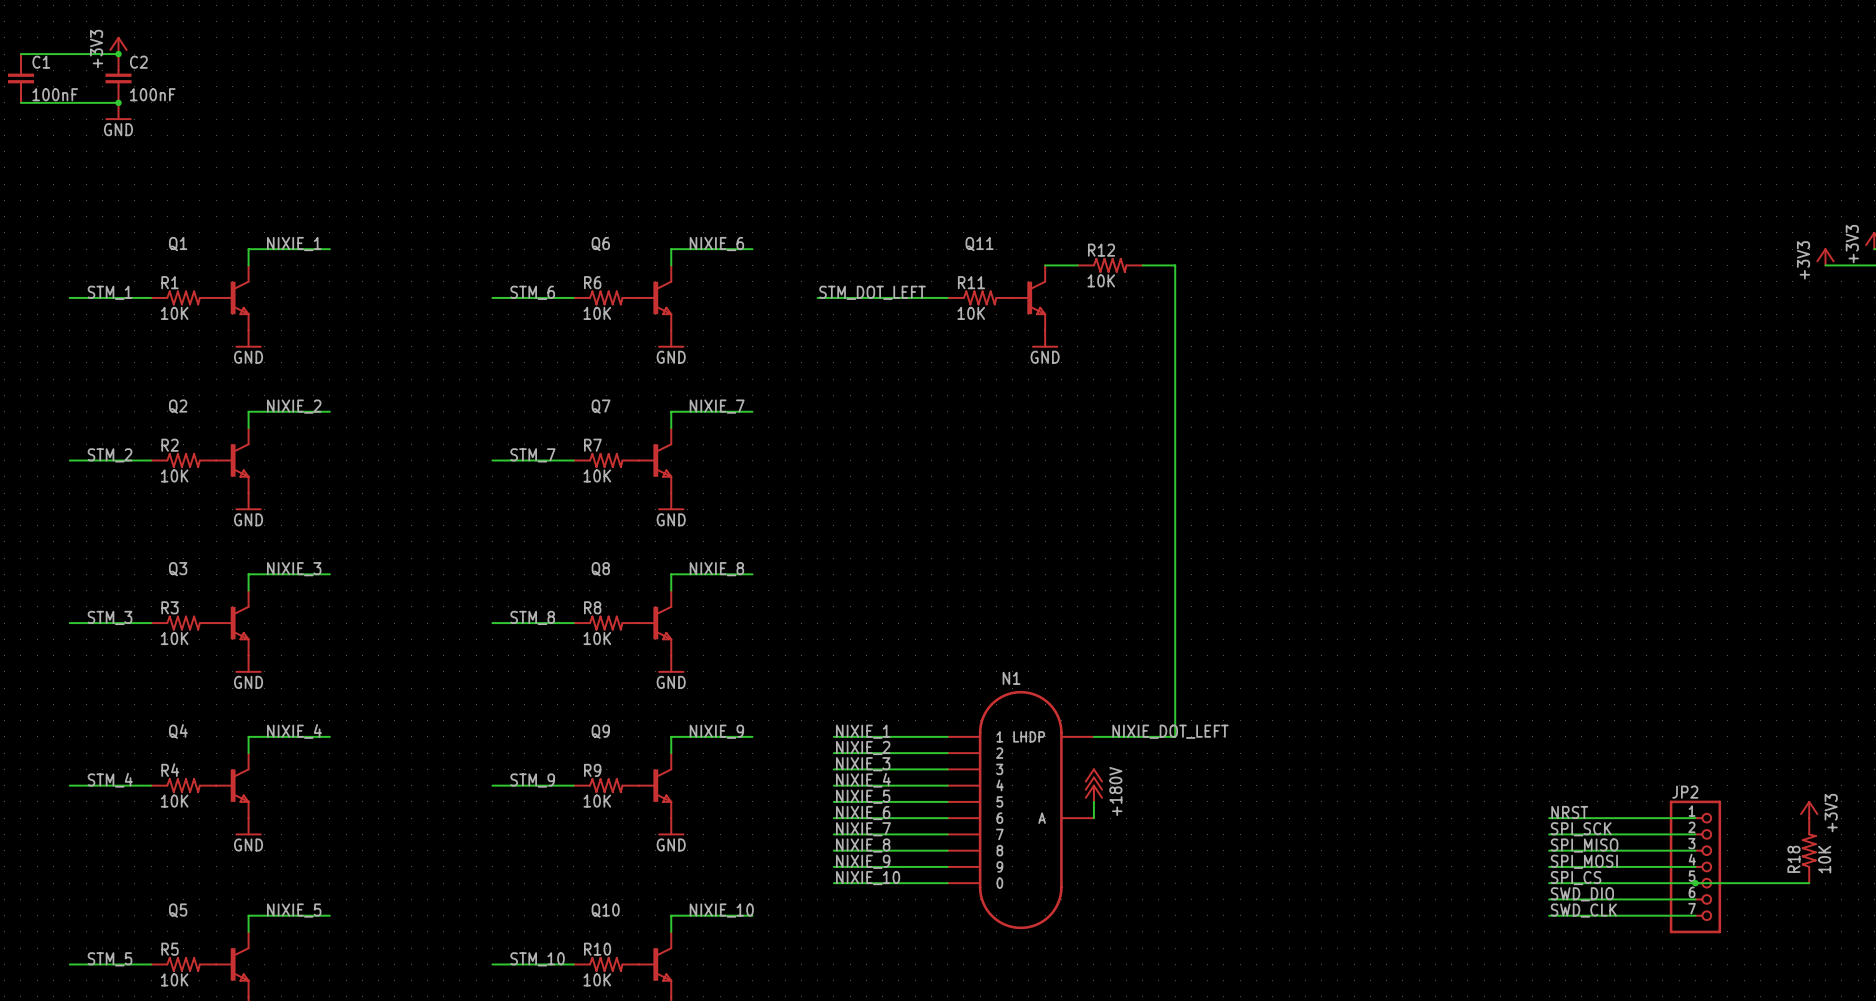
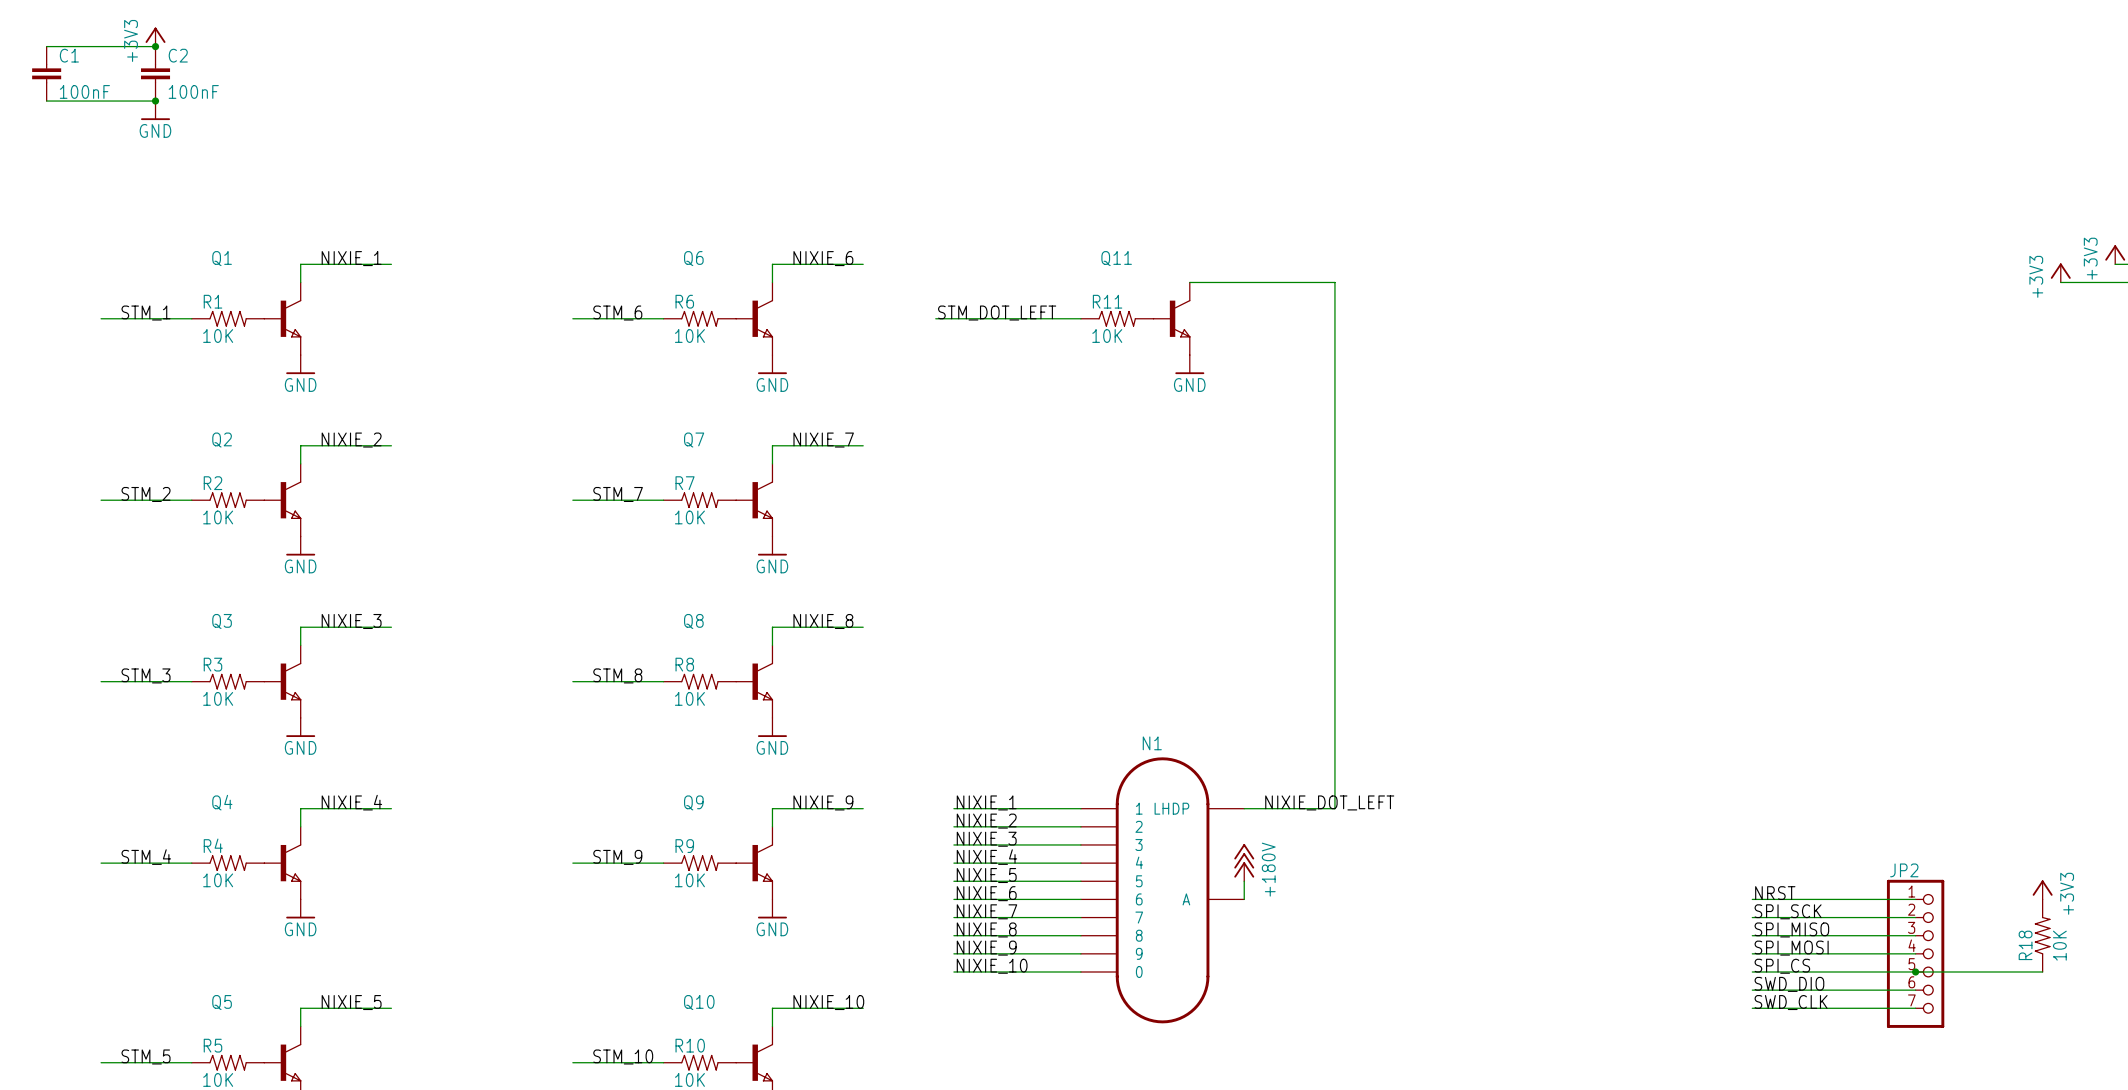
R12: 10K (1110, 265) -> none

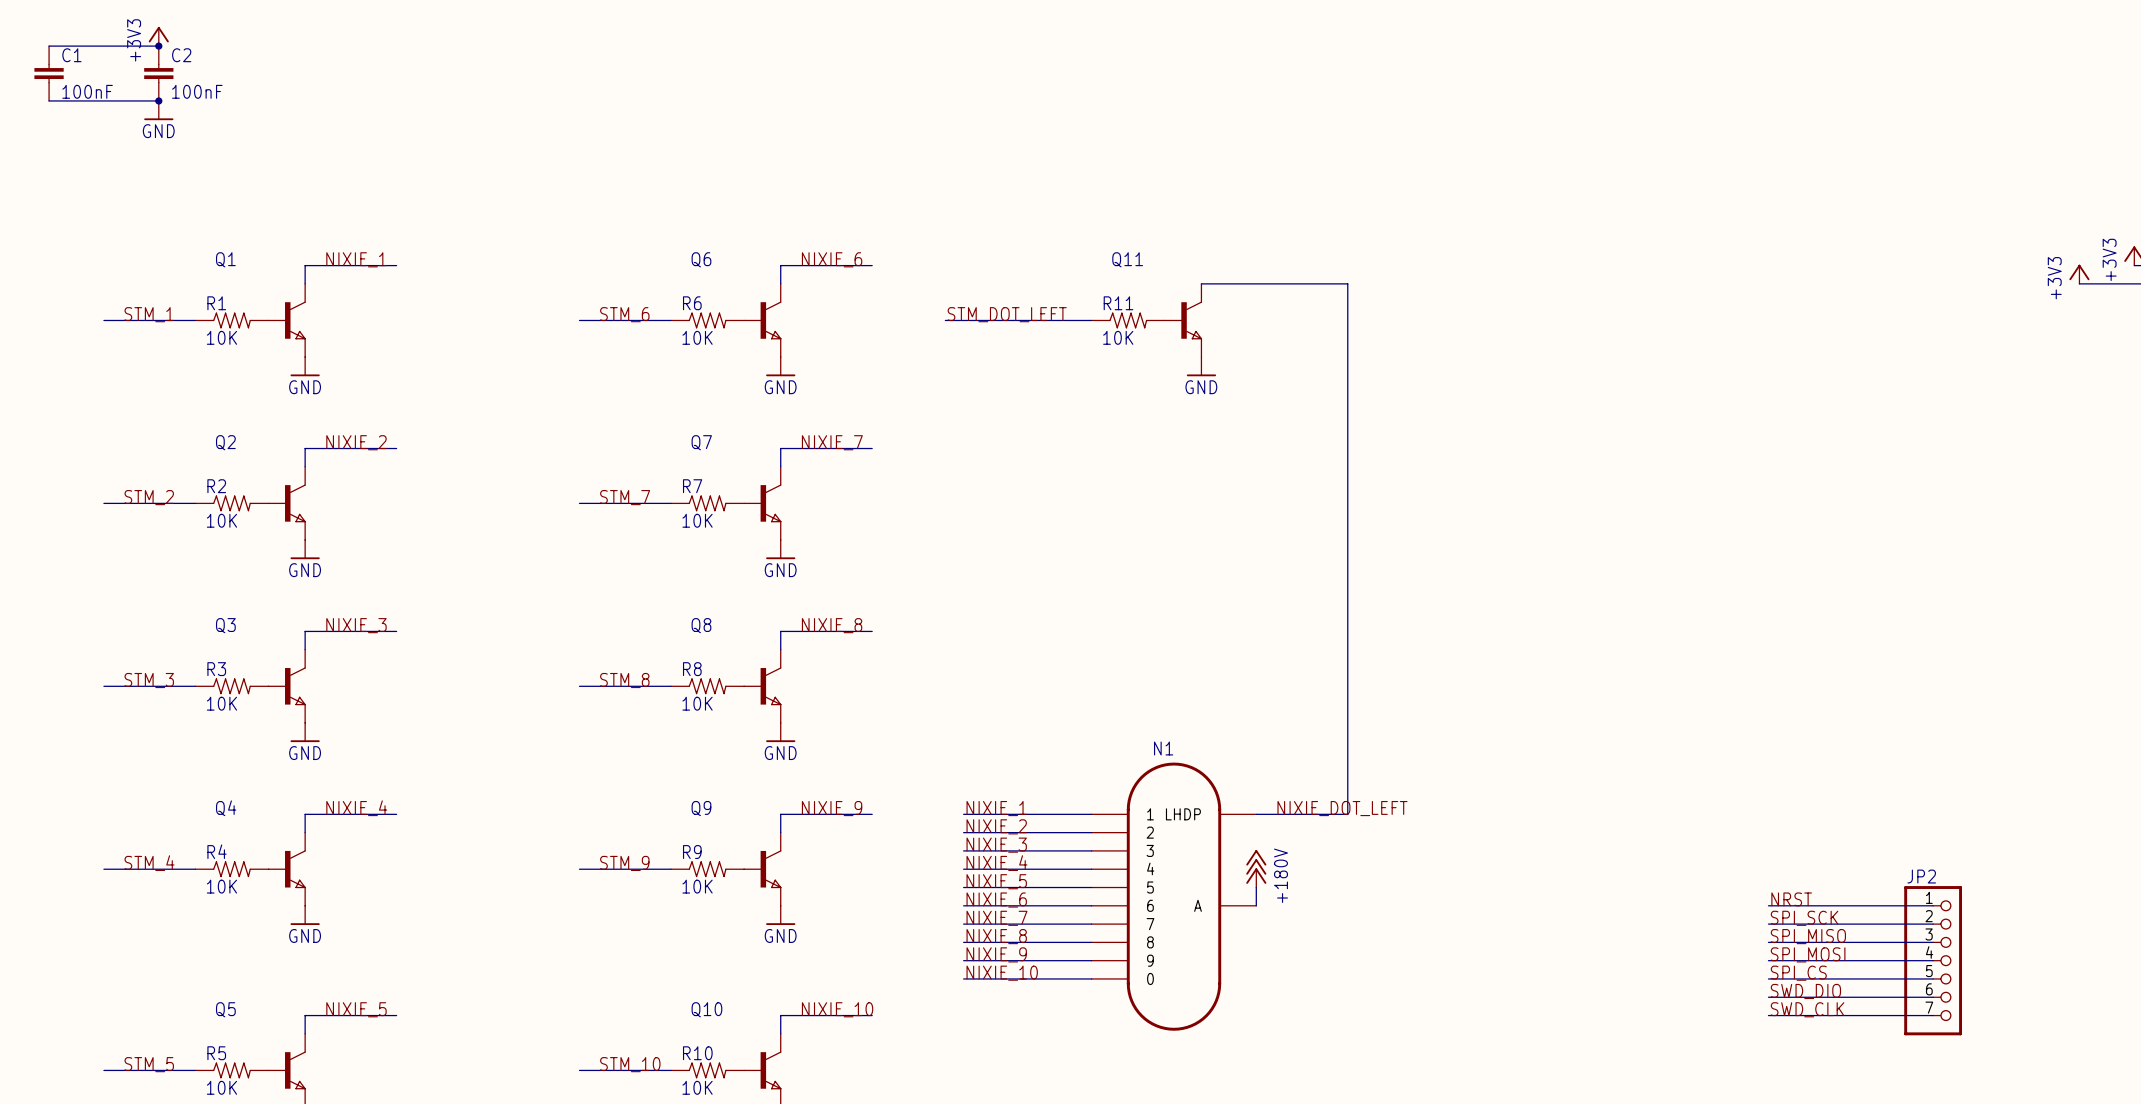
power symbol: +3V3 (2042, 889) -> none
R18: 10K (2042, 935) -> none
wire: (1915, 971) (2042, 971) -> none
junction: (1915, 971) -> none

